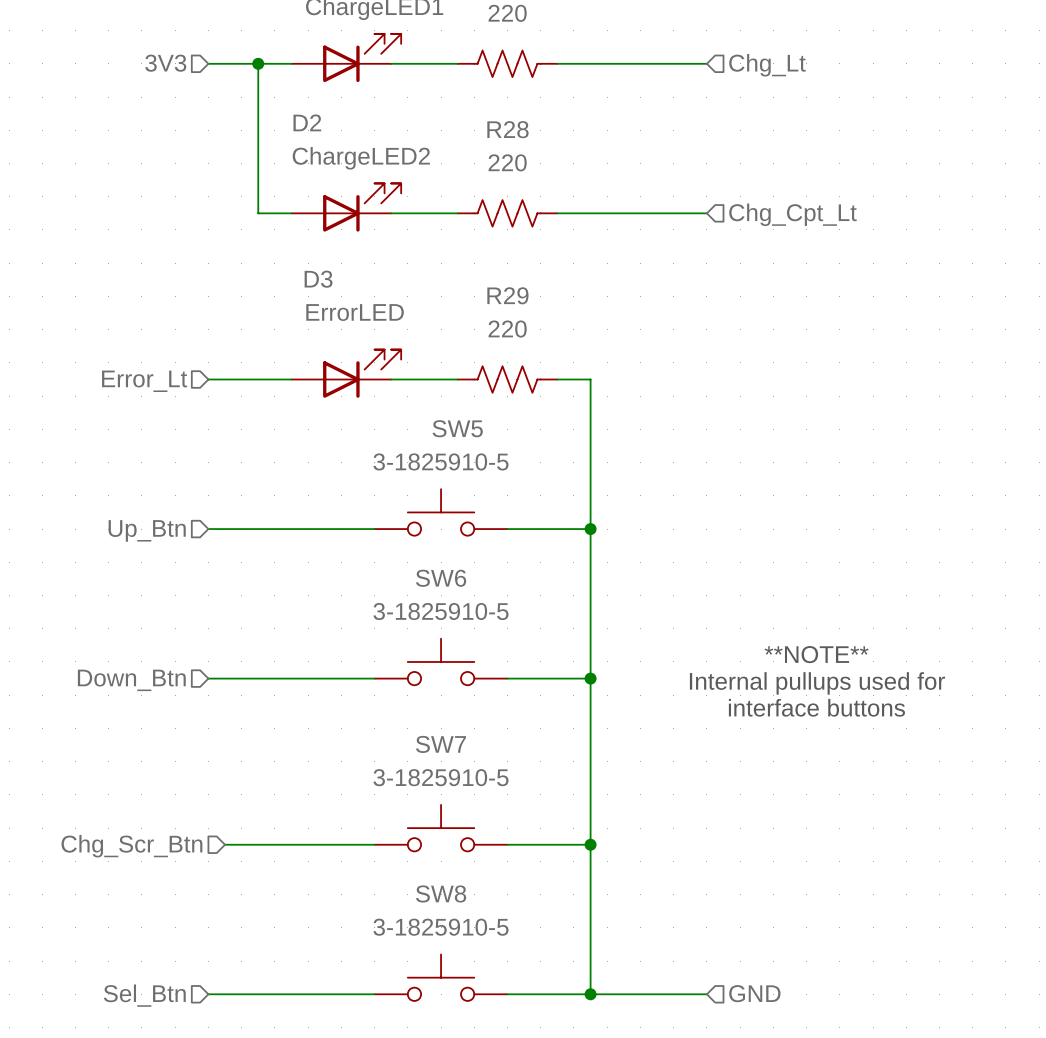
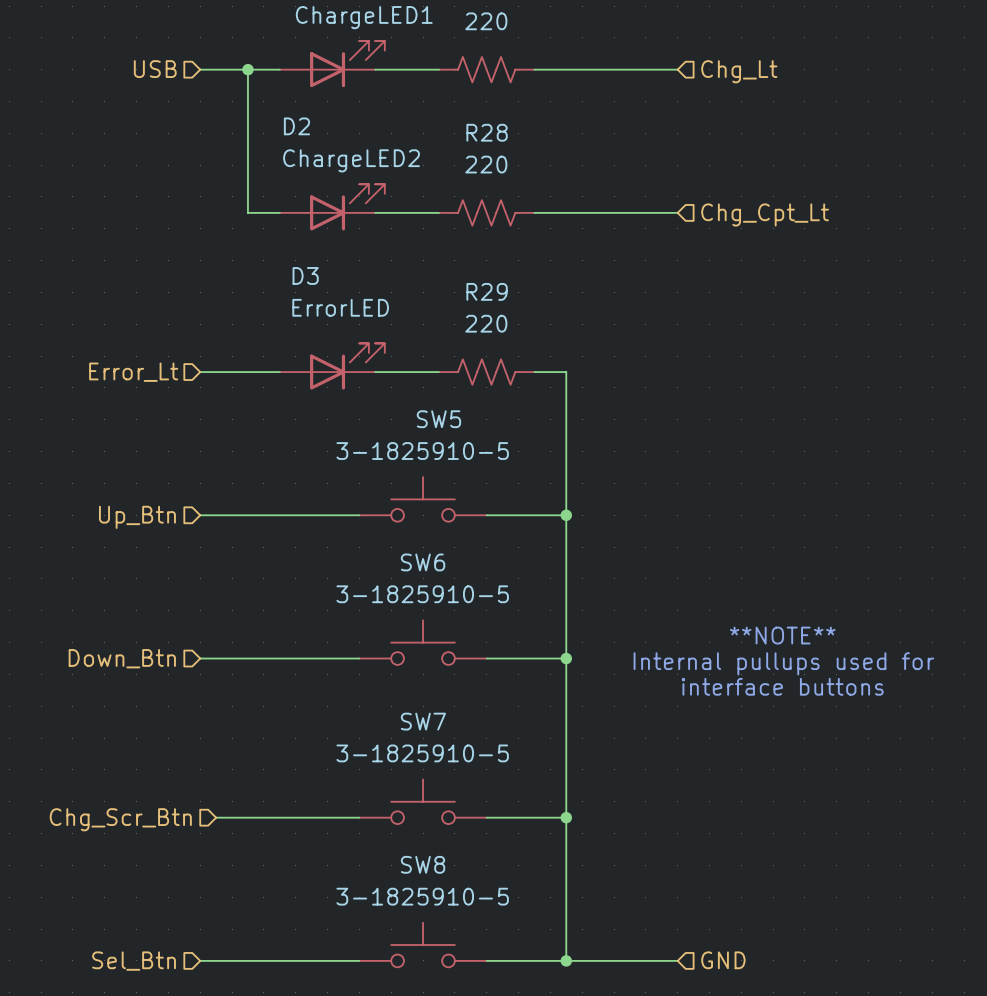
hierarchical label: 3V3 (165, 63) -> USB (155, 69)

